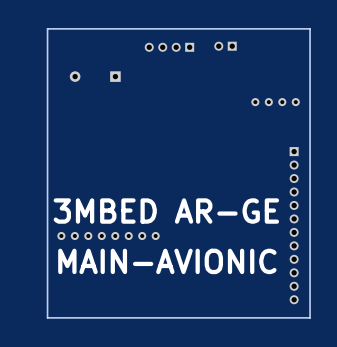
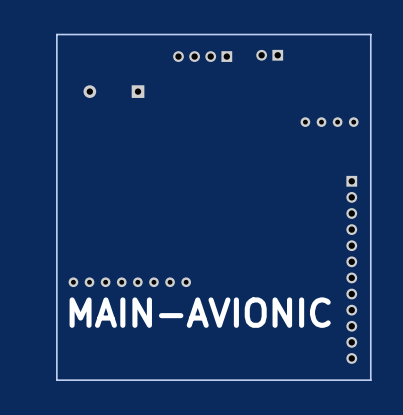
text: 3MBED AR-GE (166, 211) -> none

